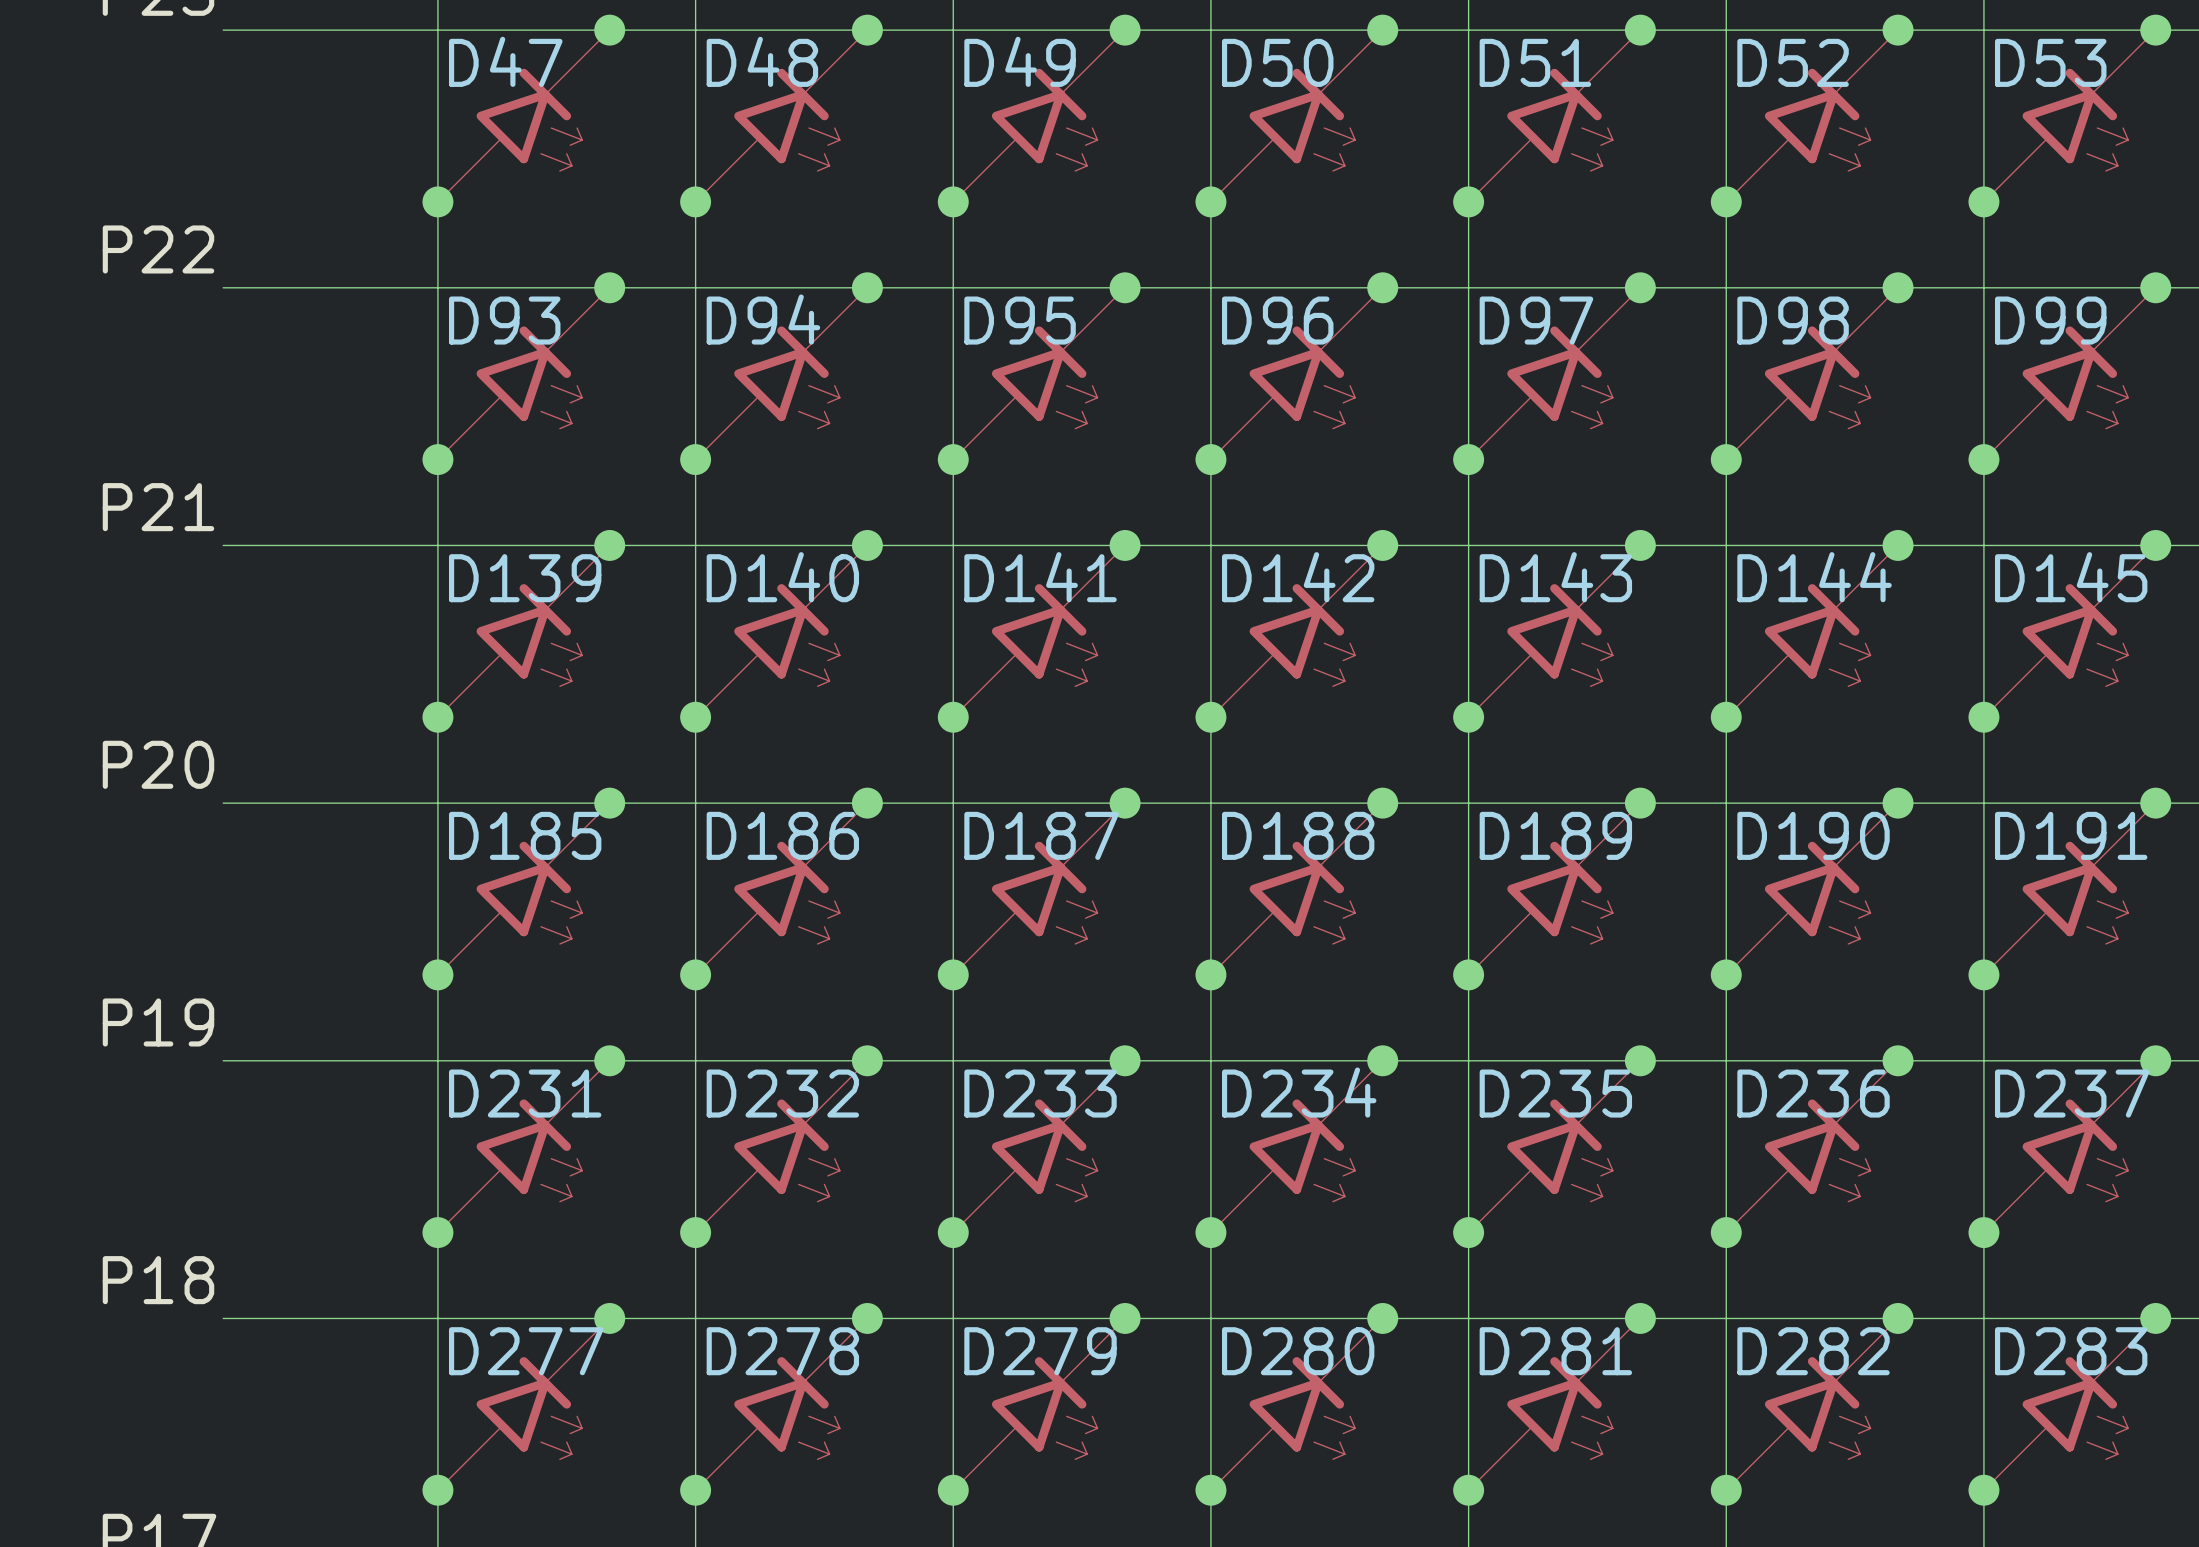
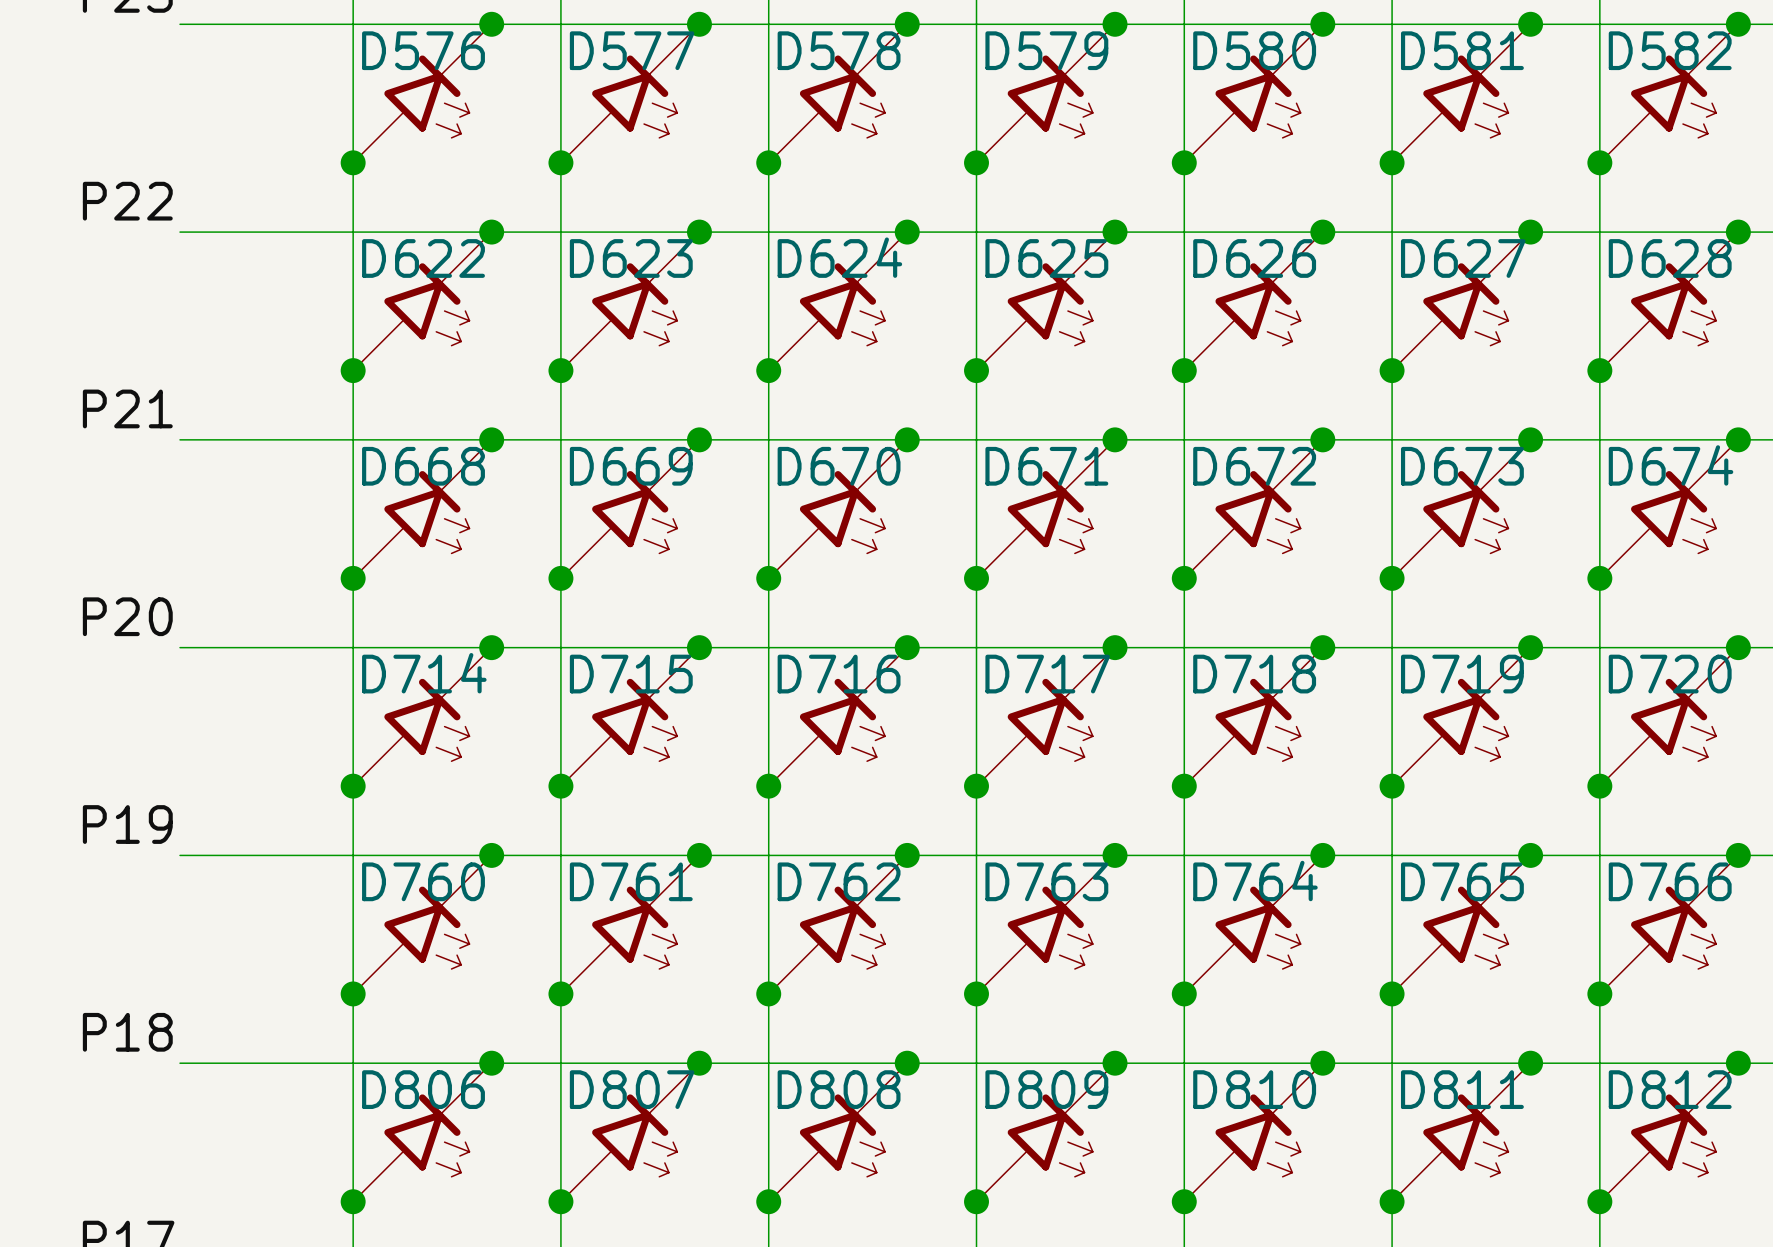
D47 name: D47 (505, 61) -> D576 (423, 50)
D48 name: D48 (762, 61) -> D577 (632, 50)
D49 name: D49 (1020, 61) -> D578 (839, 50)
D50 name: D50 (1277, 62) -> D579 (1046, 50)
D51 name: D51 (1535, 62) -> D580 (1254, 50)
D52 name: D52 (1793, 62) -> D581 (1462, 50)
D53 name: D53 (2050, 62) -> D582 (1670, 50)
D94 name: D94 (763, 319) -> D623 (631, 258)
D93 name: D93 (504, 320) -> D622 (423, 258)
D95 name: D95 (1020, 320) -> D624 (839, 257)
D96 name: D96 (1277, 320) -> D625 (1046, 258)
D97 name: D97 (1536, 320) -> D626 (1254, 258)
D98 name: D98 (1793, 320) -> D627 (1463, 258)
D99 name: D99 (2050, 320) -> D628 (1670, 258)
D140 name: D140 (782, 577) -> D669 (631, 466)
D141 name: D141 (1040, 577) -> D670 (839, 466)
D142 name: D142 (1298, 577) -> D671 (1046, 466)
D143 name: D143 (1555, 577) -> D672 (1254, 466)
D144 name: D144 (1814, 577) -> D673 (1462, 466)
D145 name: D145 (2071, 577) -> D674 (1671, 465)
D139 name: D139 (525, 578) -> D668 (423, 466)
D185 name: D185 (525, 835) -> D714 (424, 673)
D186 name: D186 (782, 835) -> D715 (631, 674)
D187 name: D187 (1041, 835) -> D716 (839, 674)
D188 name: D188 (1298, 835) -> D717 (1047, 674)
D189 name: D189 (1555, 835) -> D718 (1254, 674)
D190 name: D190 (1813, 835) -> D719 (1462, 674)
D191 name: D191 (2071, 835) -> D720 (1670, 674)
D234 name: D234 (1299, 1092) -> D763 (1046, 881)
D231 name: D231 (525, 1093) -> D760 (423, 881)
D232 name: D232 (782, 1093) -> D761 (631, 881)
D233 name: D233 (1040, 1093) -> D762 (839, 881)
D235 name: D235 (1555, 1093) -> D764 (1255, 881)
D236 name: D236 (1813, 1093) -> D765 (1462, 881)
D237 name: D237 (2072, 1093) -> D766 (1670, 881)
D277 name: D277 (526, 1351) -> D806 (423, 1089)
D278 name: D278 (782, 1351) -> D807 (632, 1089)
D279 name: D279 (1040, 1351) -> D808 (839, 1089)
D280 name: D280 (1298, 1351) -> D809 (1046, 1089)
D281 name: D281 (1555, 1351) -> D810 (1254, 1089)
D282 name: D282 (1813, 1351) -> D811 (1462, 1089)
D283 name: D283 (2071, 1351) -> D812 (1670, 1089)

